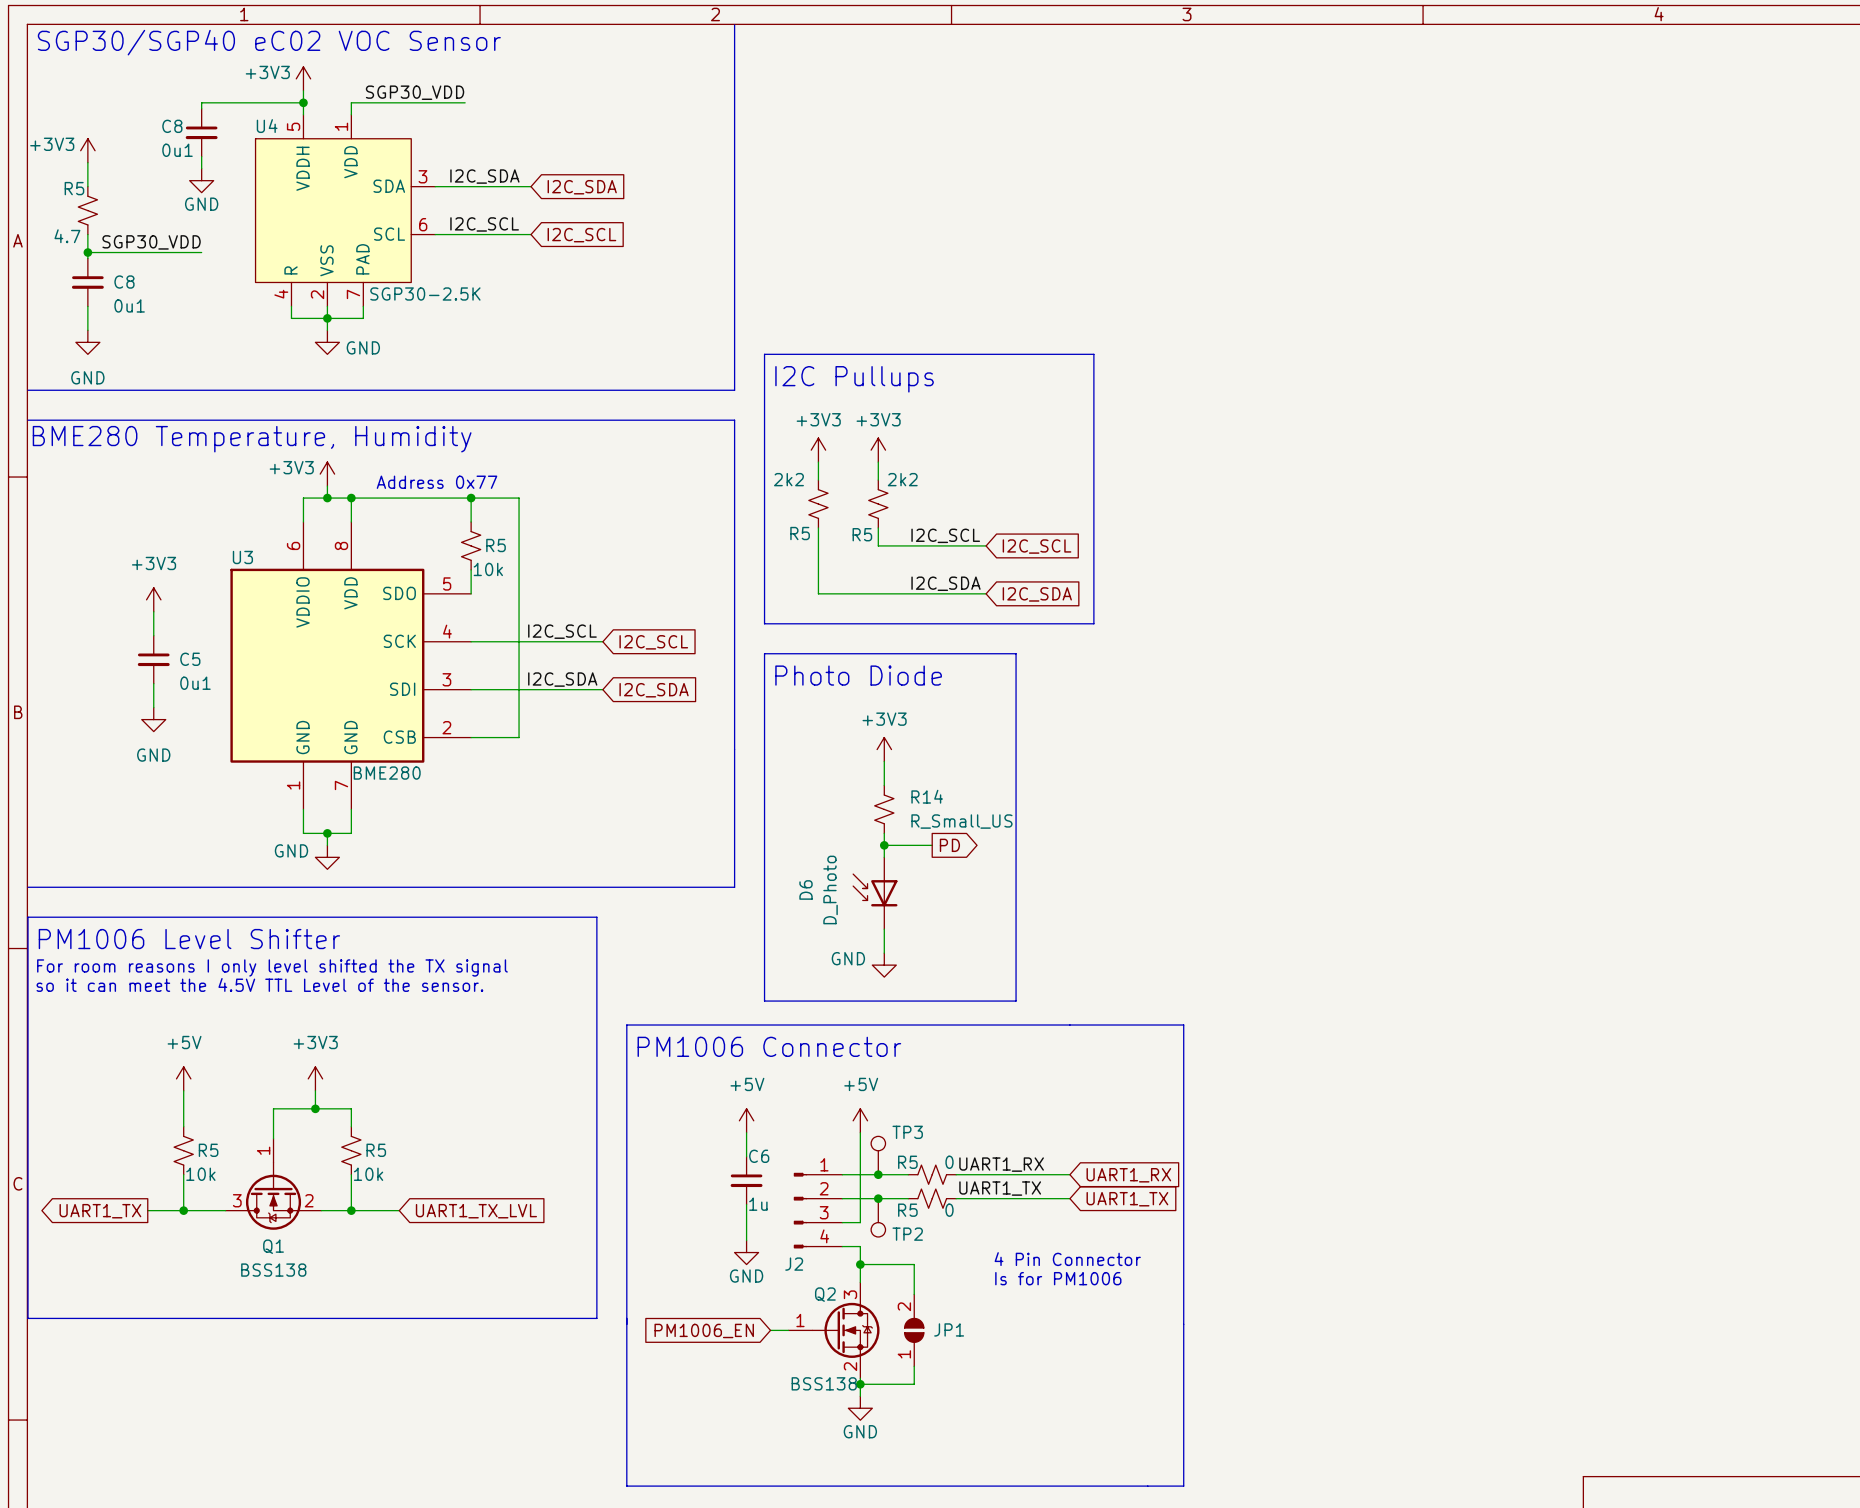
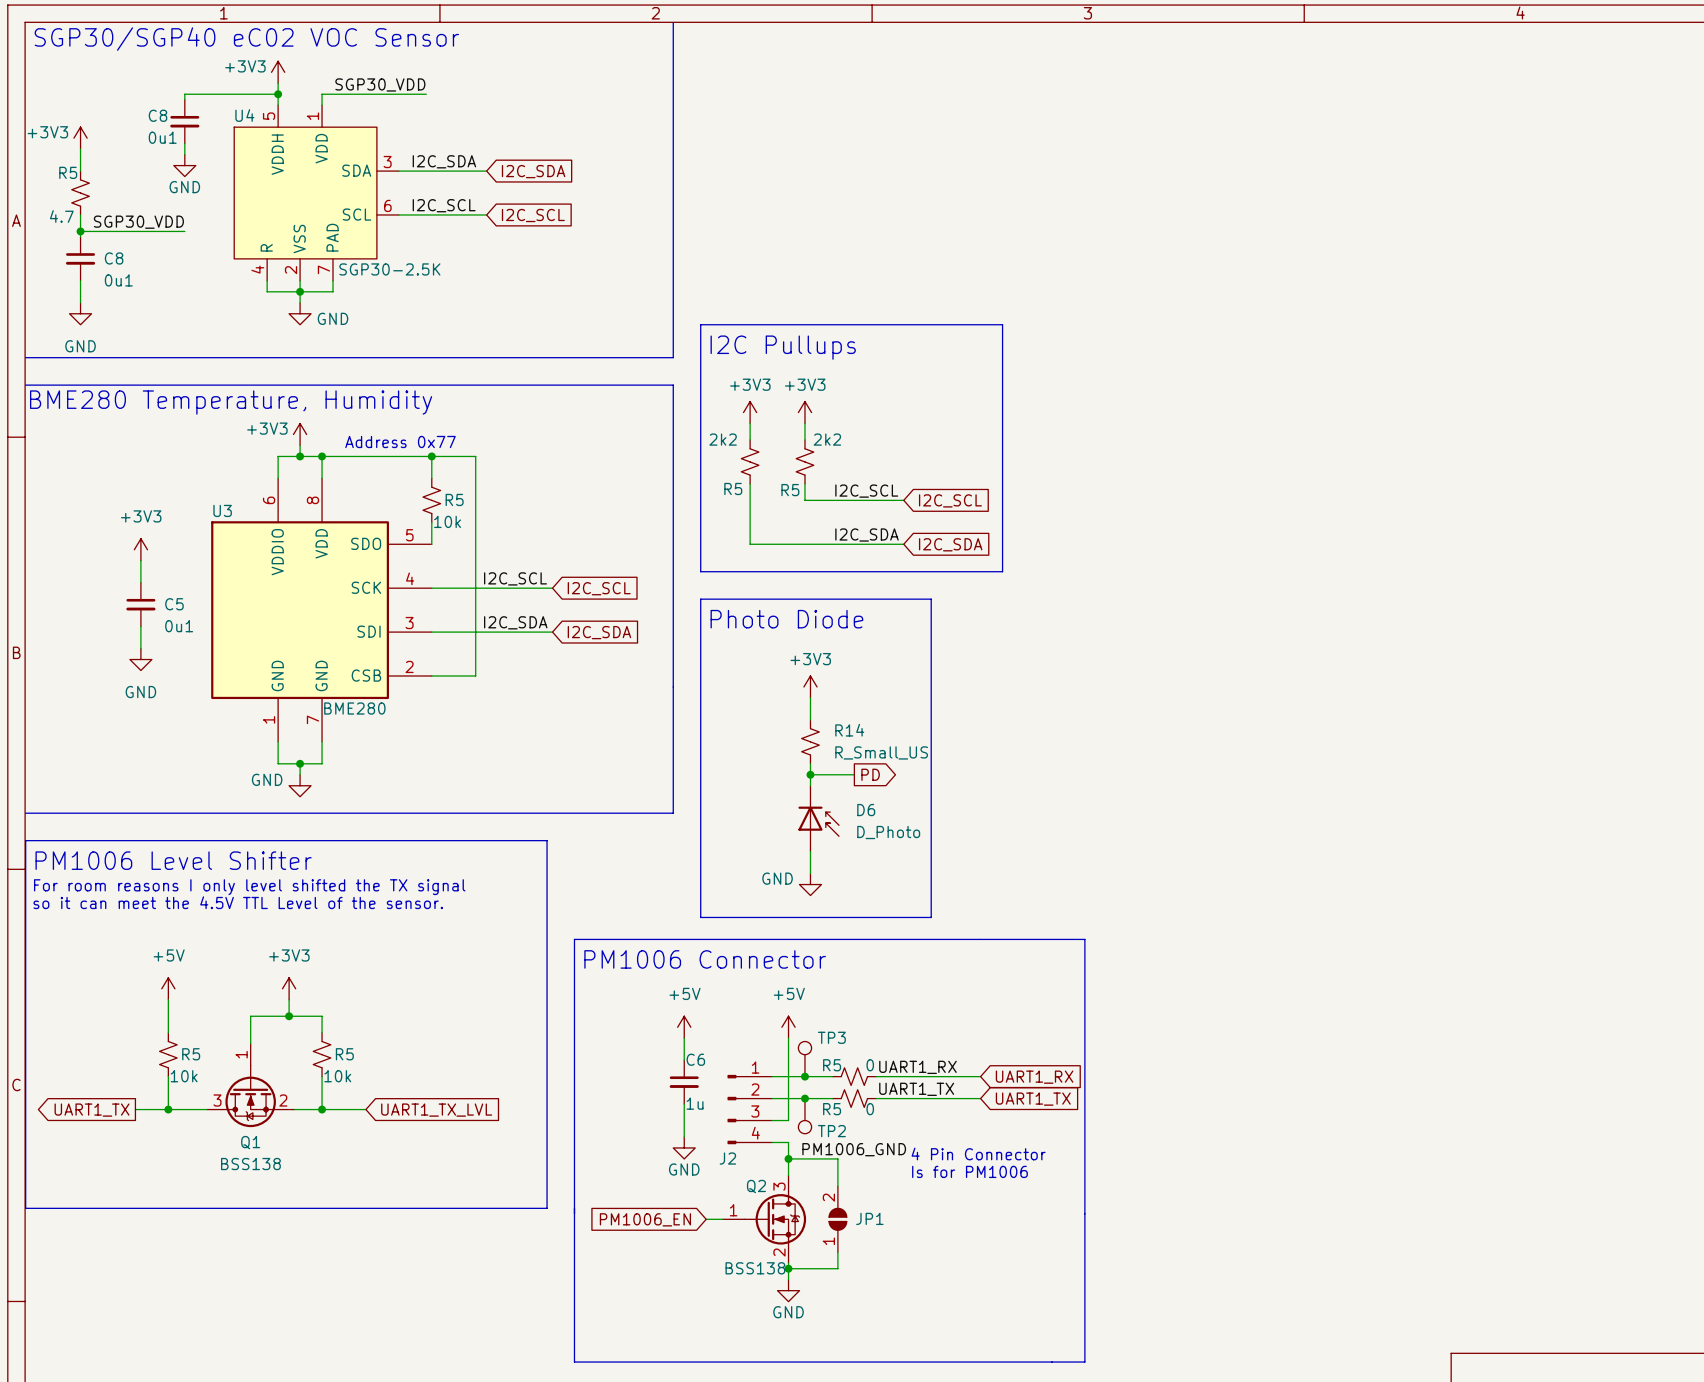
D6 name position: D6 (806, 889) -> D6 (866, 810)
D6 value position: D_Photo (830, 889) -> D_Photo (888, 832)
D6 rotation: 0° (875, 890) -> 180° (818, 821)
label: none -> PM1006_GND (854, 1149)

